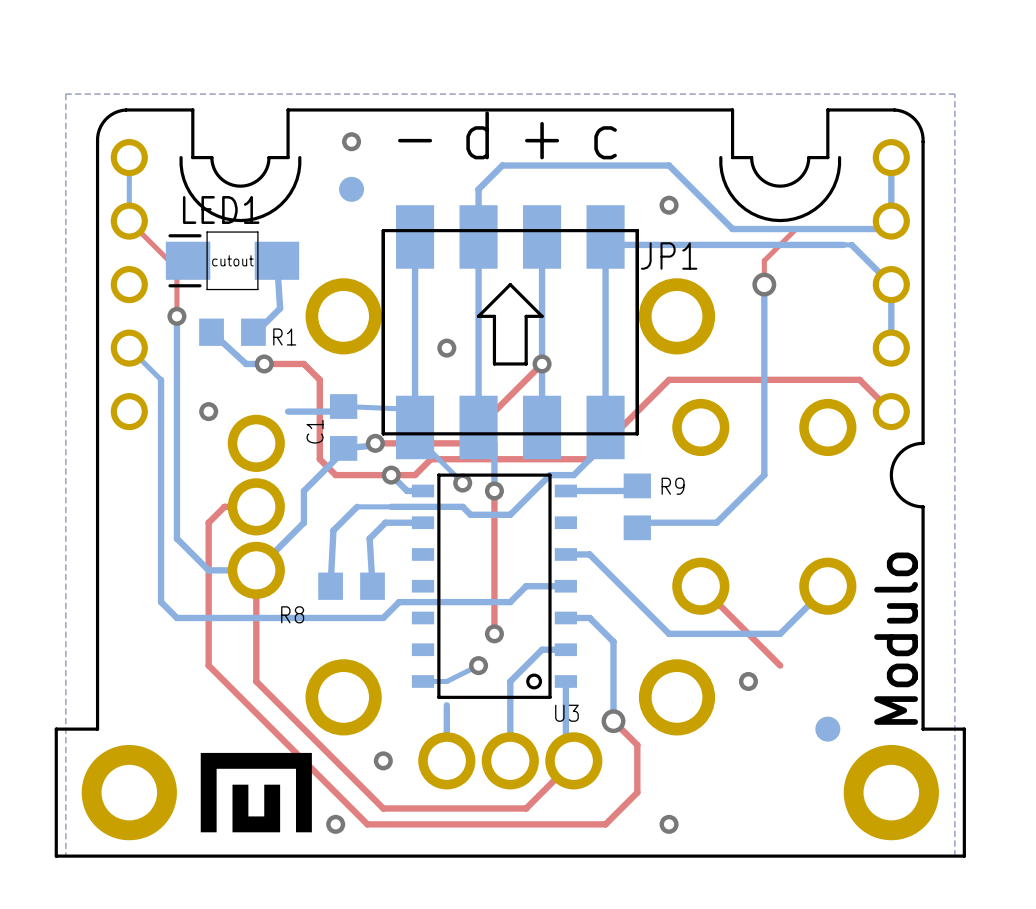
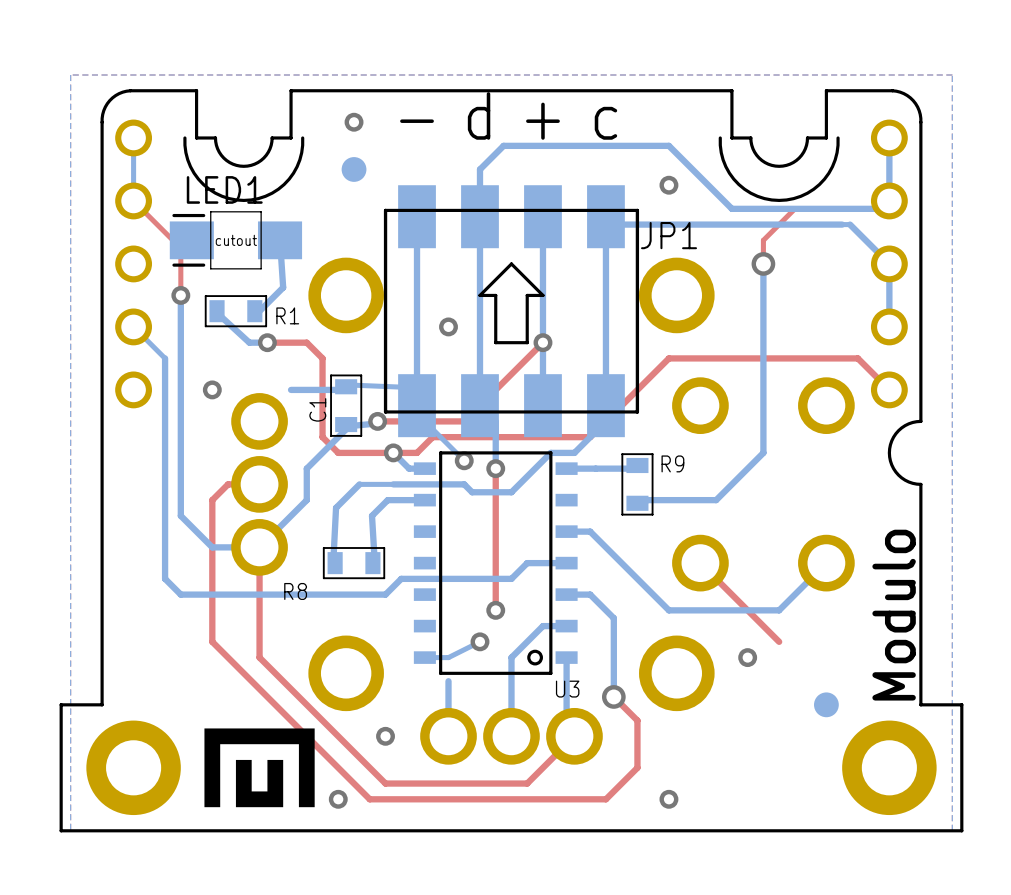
R1 footprint: [199, 318, 266, 346] -> [204, 295, 268, 328]
C1 footprint: [329, 394, 358, 461] -> [330, 374, 363, 437]
R9 footprint: [623, 473, 651, 541] -> [621, 453, 654, 516]
R8 footprint: [318, 572, 385, 600] -> [322, 547, 386, 580]

